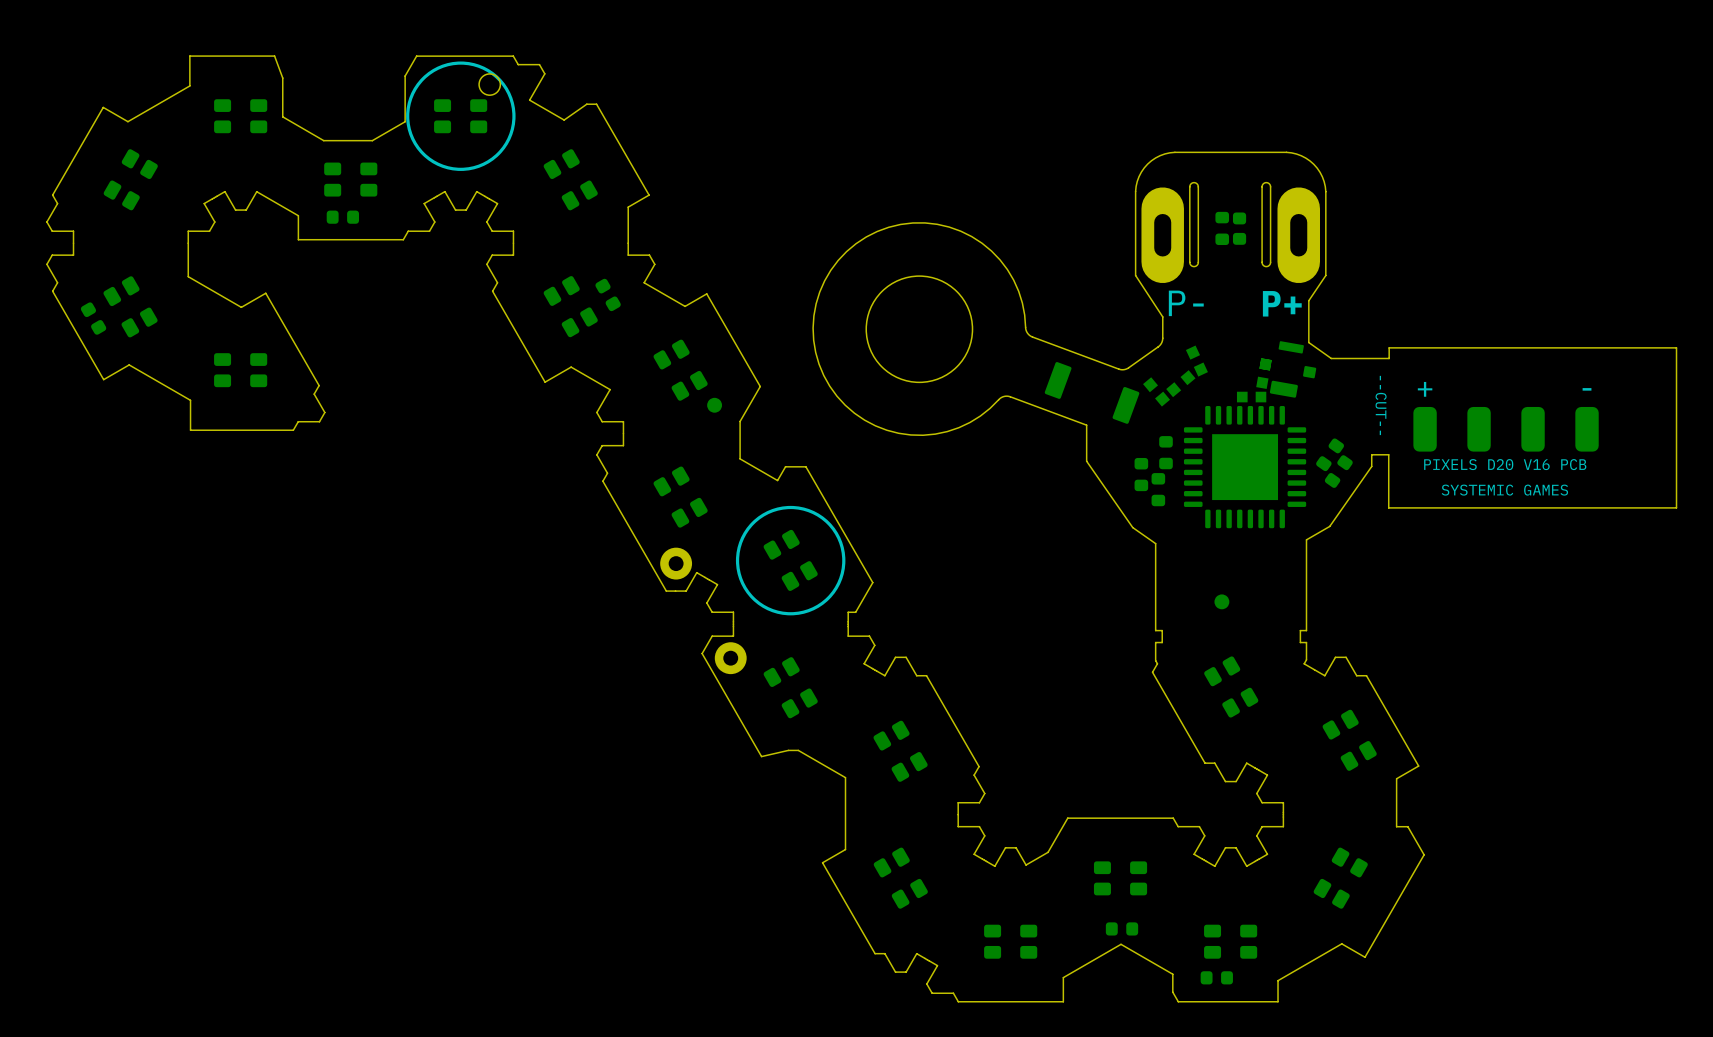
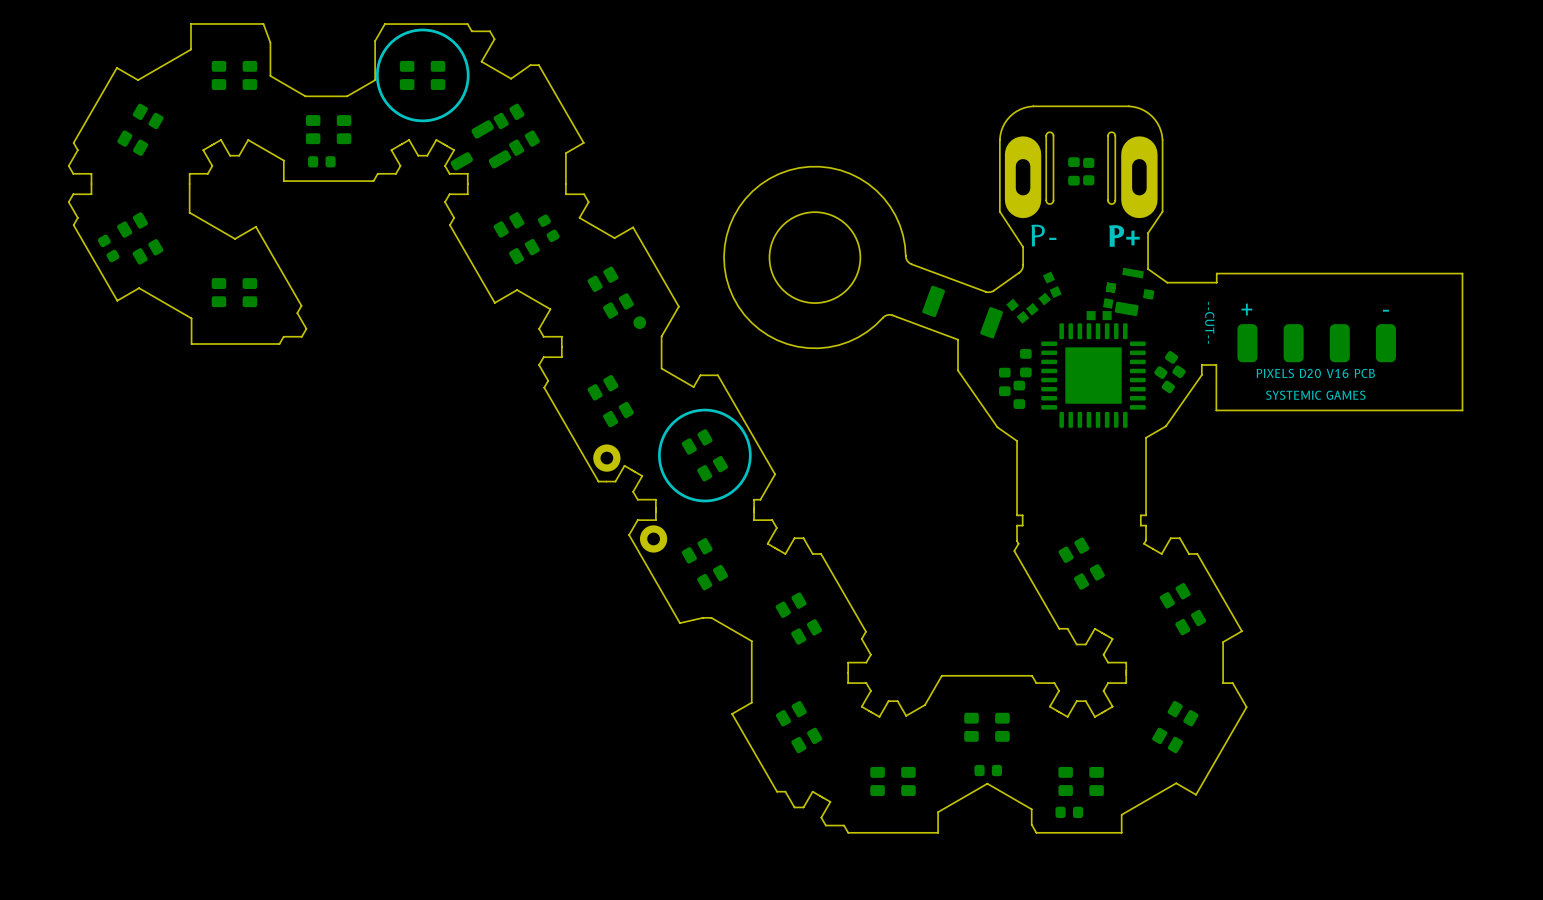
round board edge: [478, 73, 501, 96] -> none
part: none -> (480, 145)
part: (1221, 601) -> none

